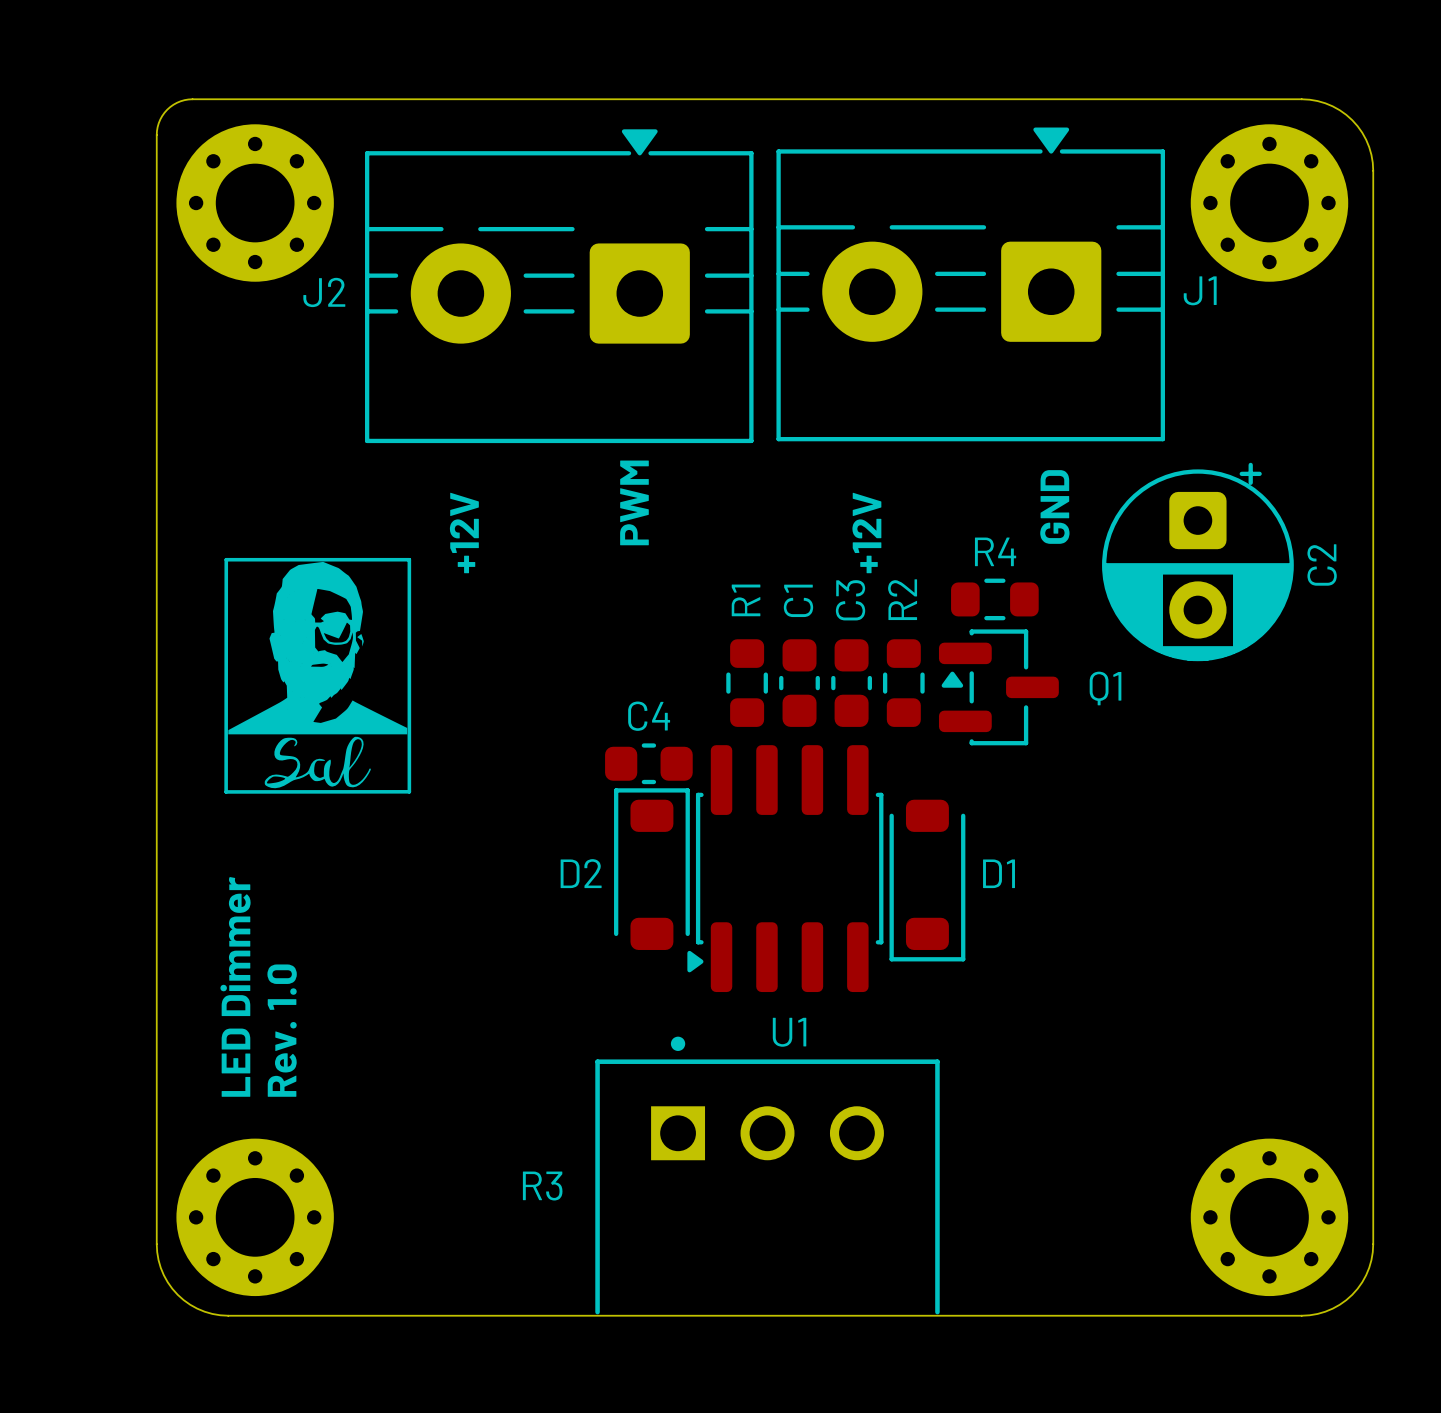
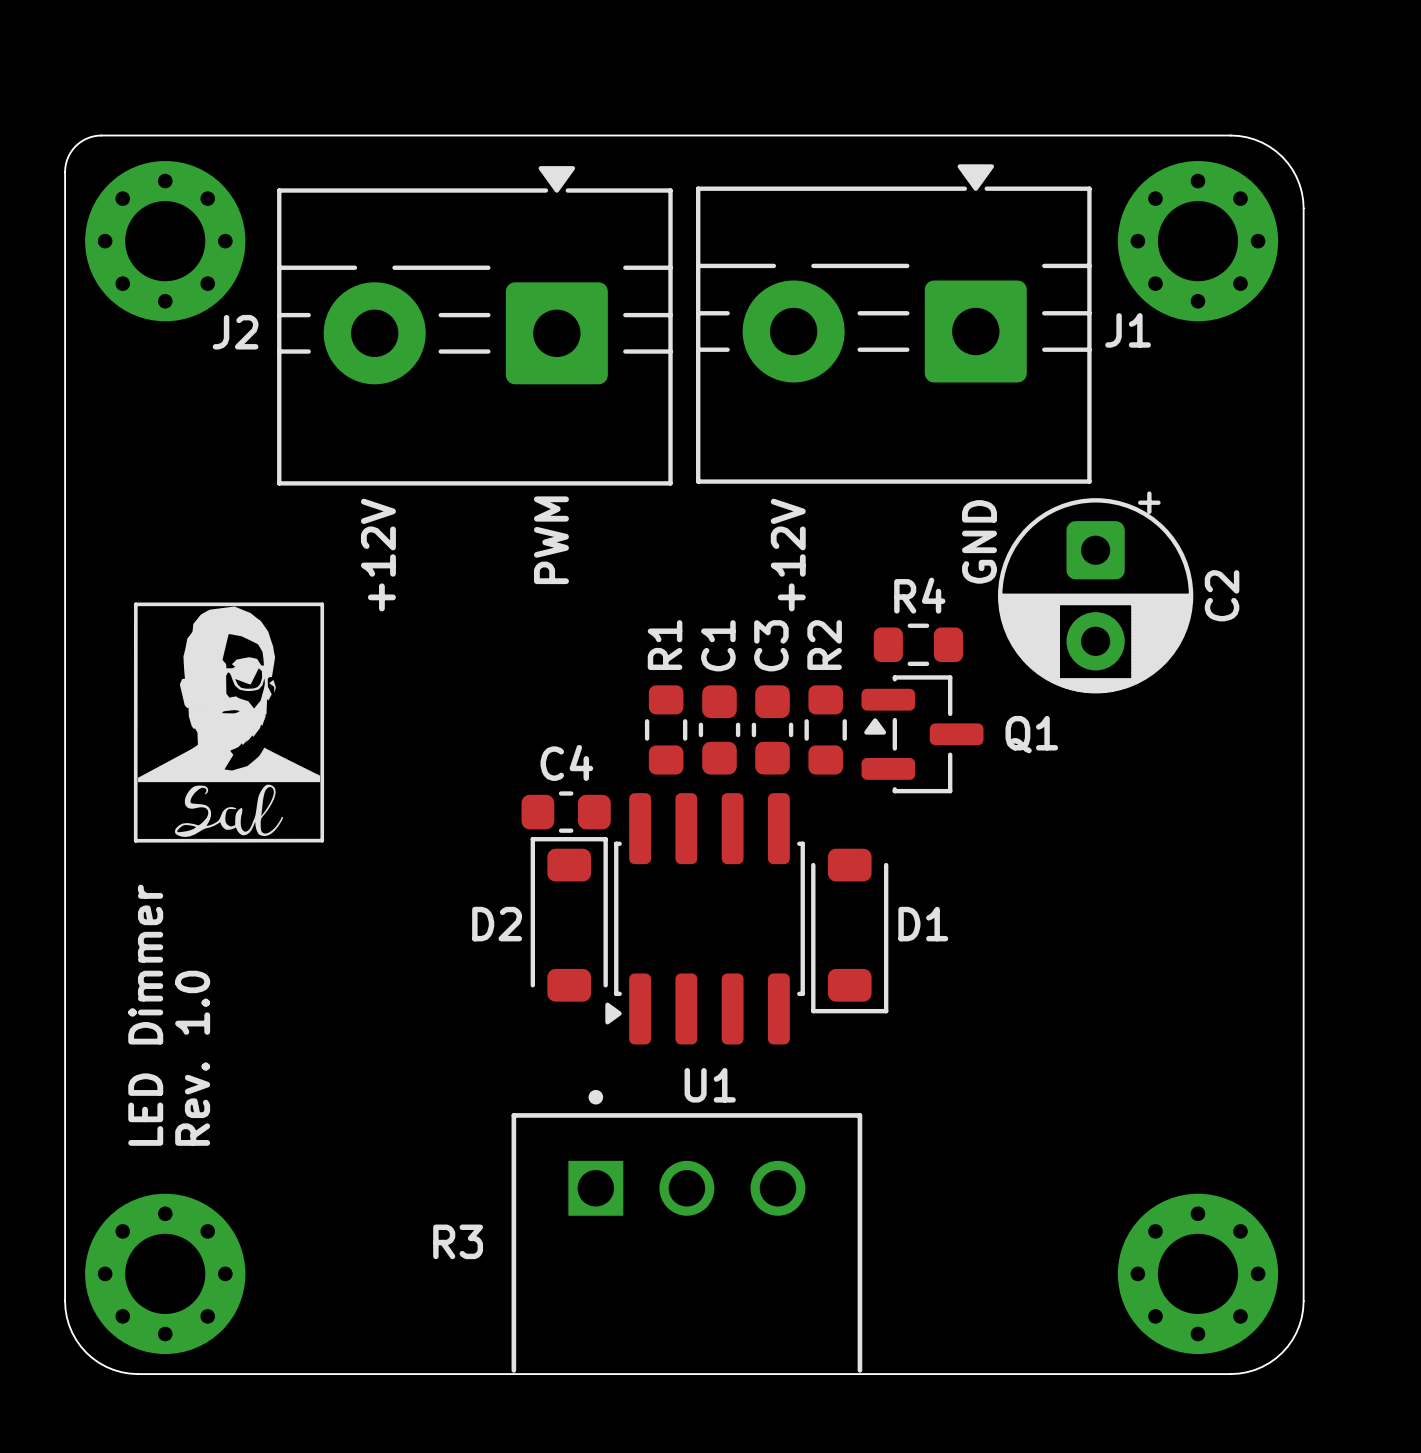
C2 position: (1197, 561) -> (1095, 592)

